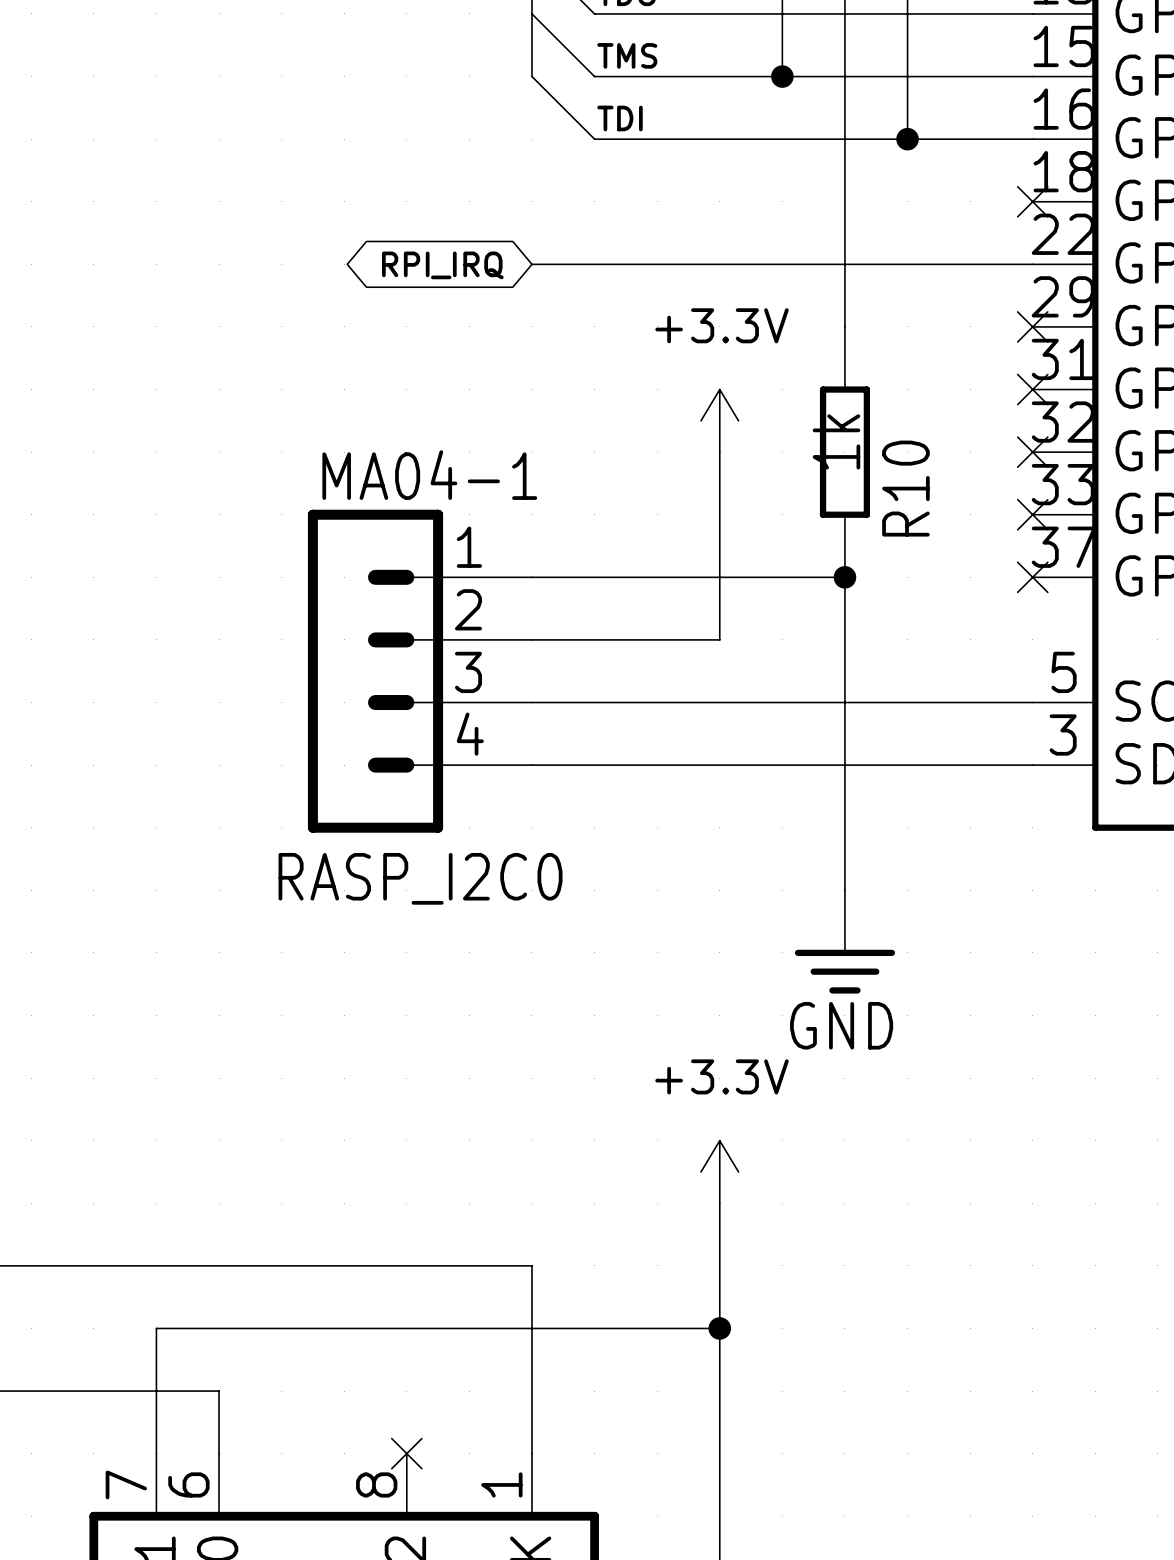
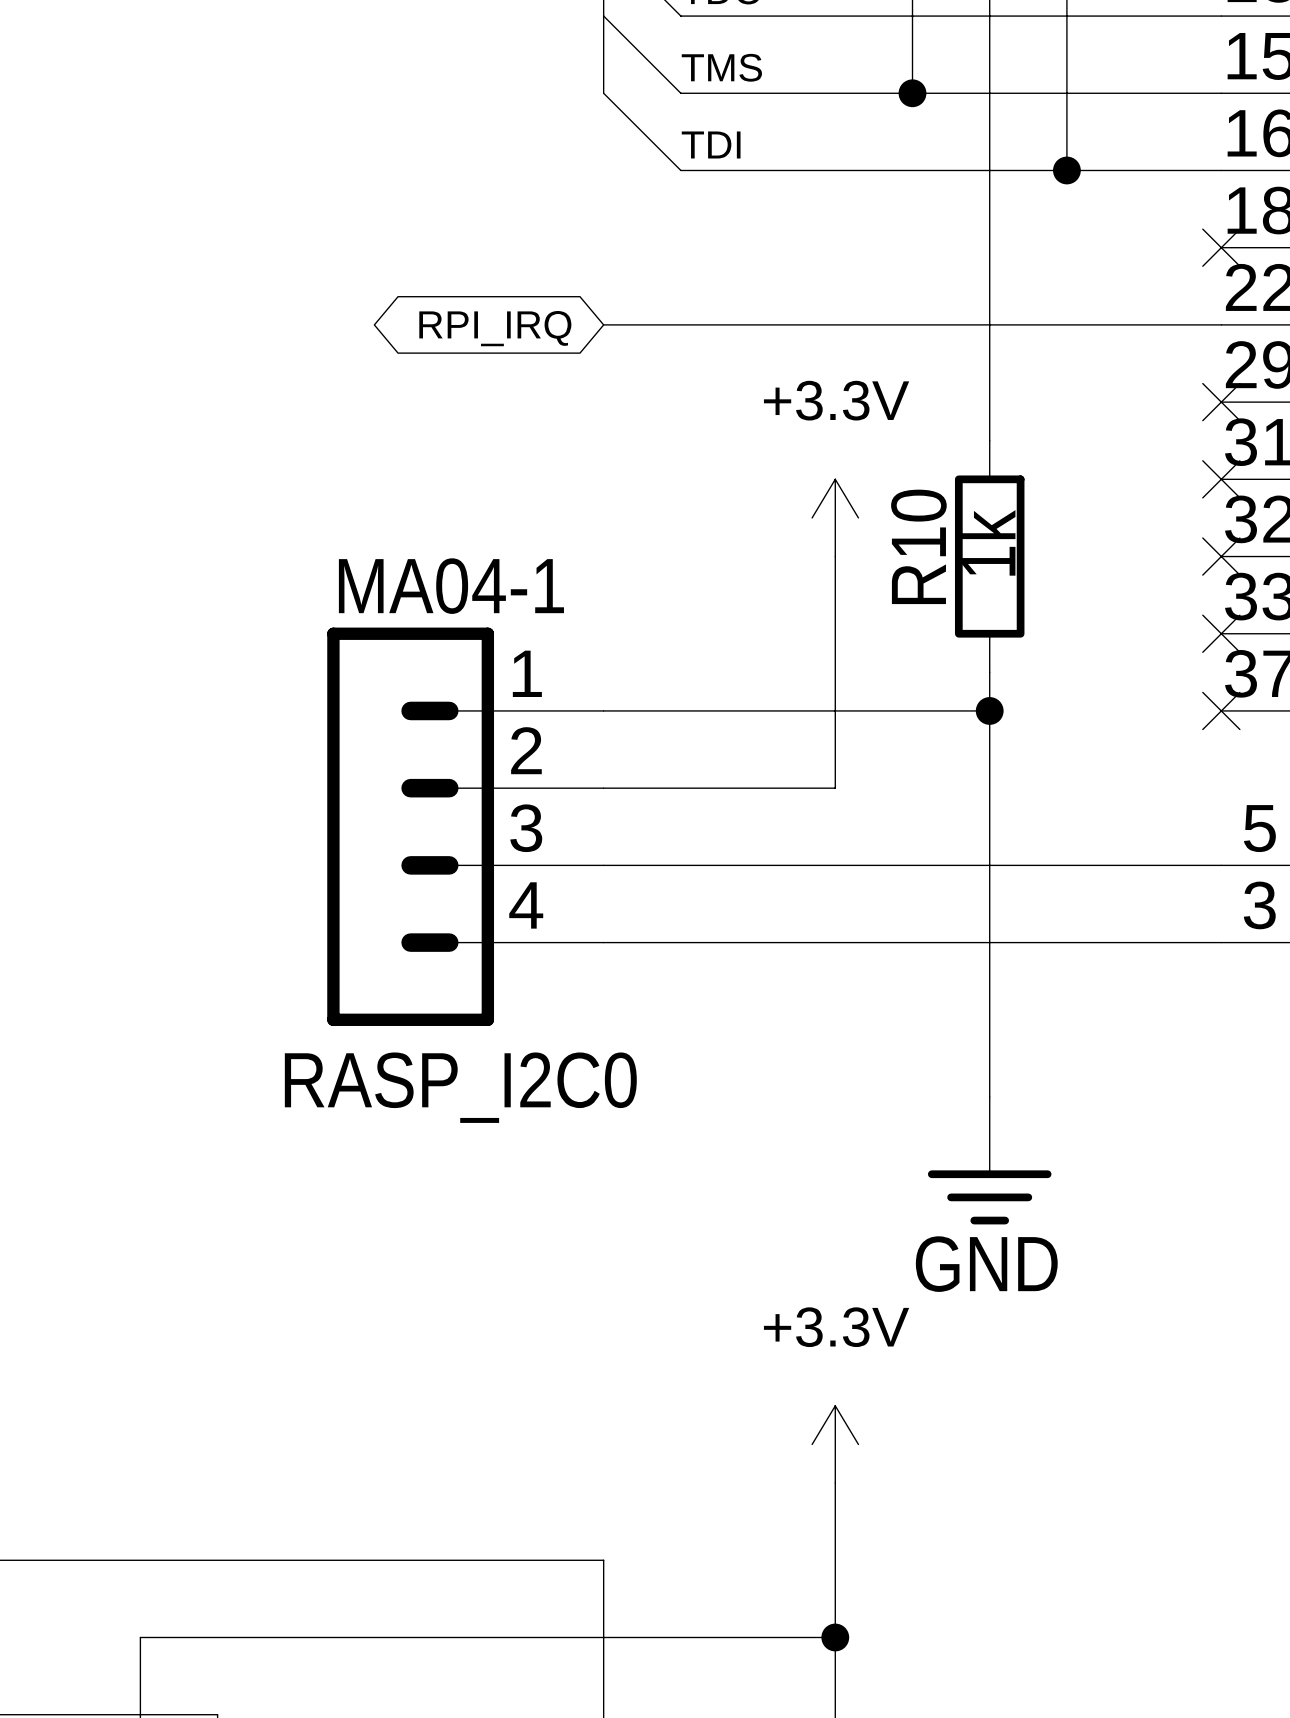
R10 symbol: [819, 326, 871, 578] -> [954, 440, 1025, 673]
R10 name position: R10 (905, 488) -> R10 (918, 546)

